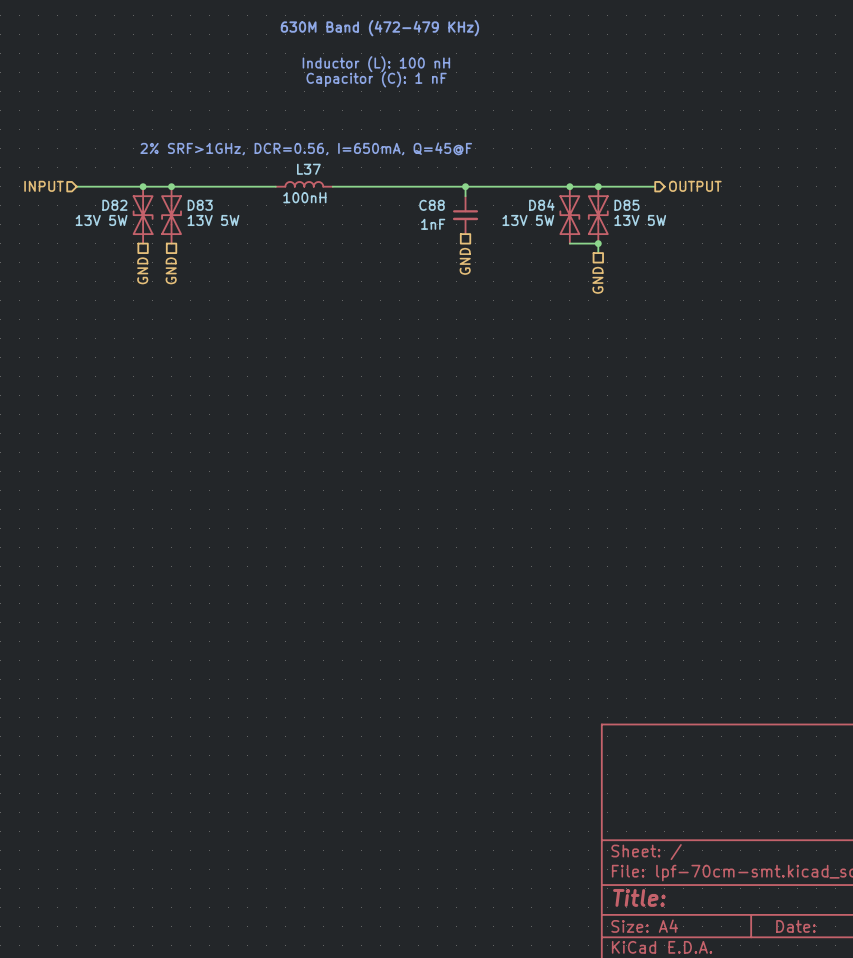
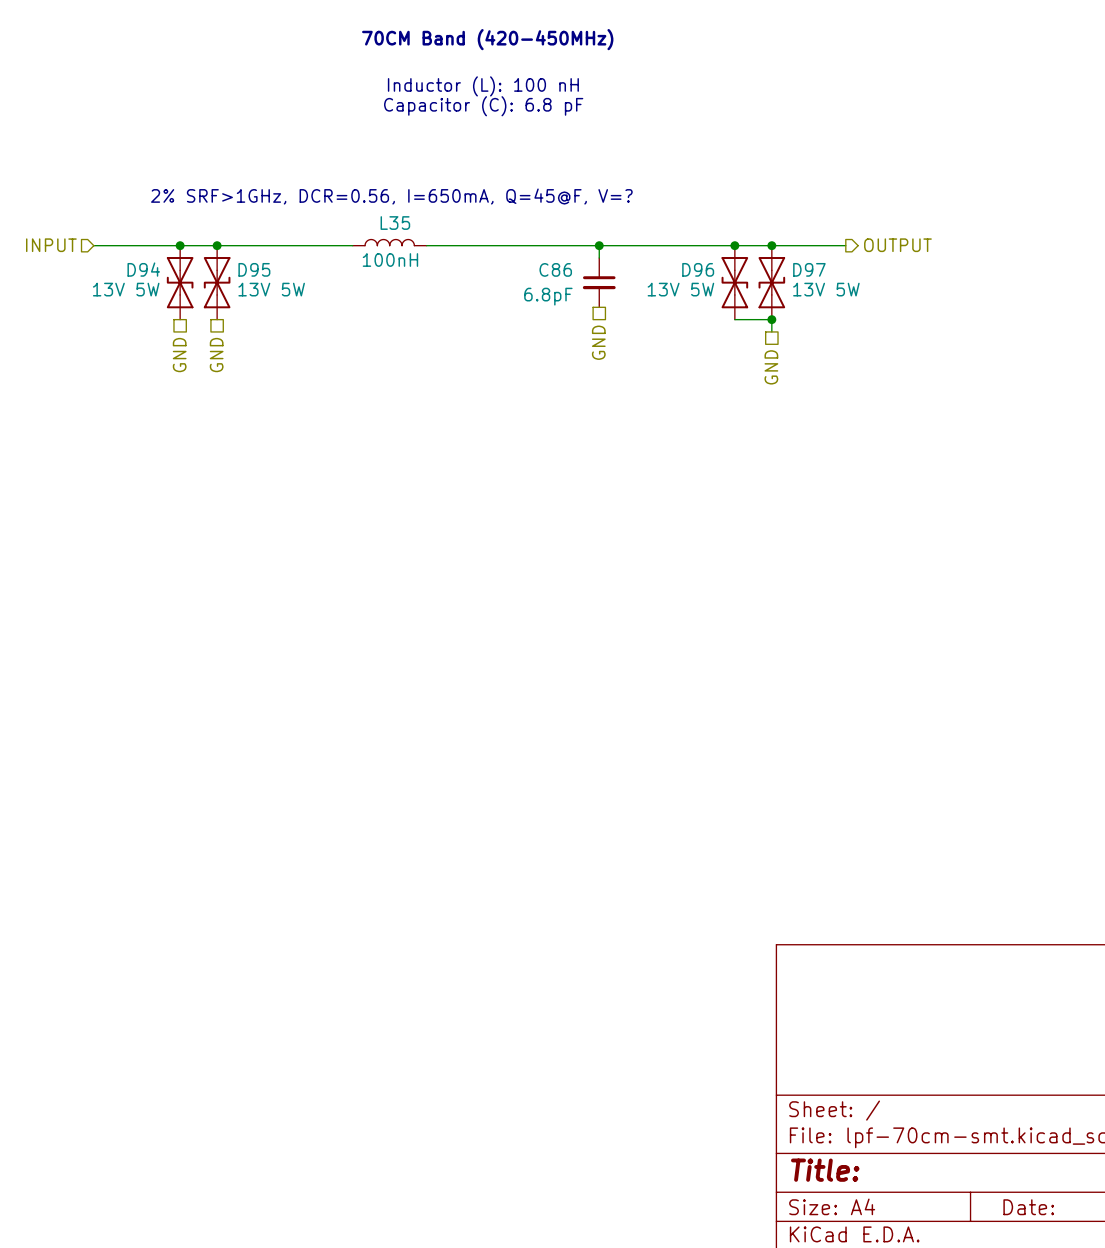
text: 630M Band (472-479 KHz) (379, 28) -> 70CM Band (420-450MHz) (487, 39)
text: Capacitor (C): 1 nF (376, 79) -> Capacitor (C): 6.8 pF (483, 106)
text: 2% SRF>1GHz, DCR=0.56, I=650mA, Q=45@F (306, 148) -> 2% SRF>1GHz, DCR=0.56, I=650mA, Q=45@F, V=? (391, 196)
L37 name: L37 (308, 169) -> L35 (395, 223)
D82 name: D82 (114, 205) -> D94 (143, 269)
D83 name: D83 (200, 205) -> D95 (254, 269)
C88 name: C88 (432, 205) -> C86 (555, 269)
D84 name: D84 (541, 205) -> D96 (698, 269)
D85 name: D85 (626, 205) -> D97 (809, 269)
C88 value: 1nF (433, 224) -> 6.8pF (548, 296)

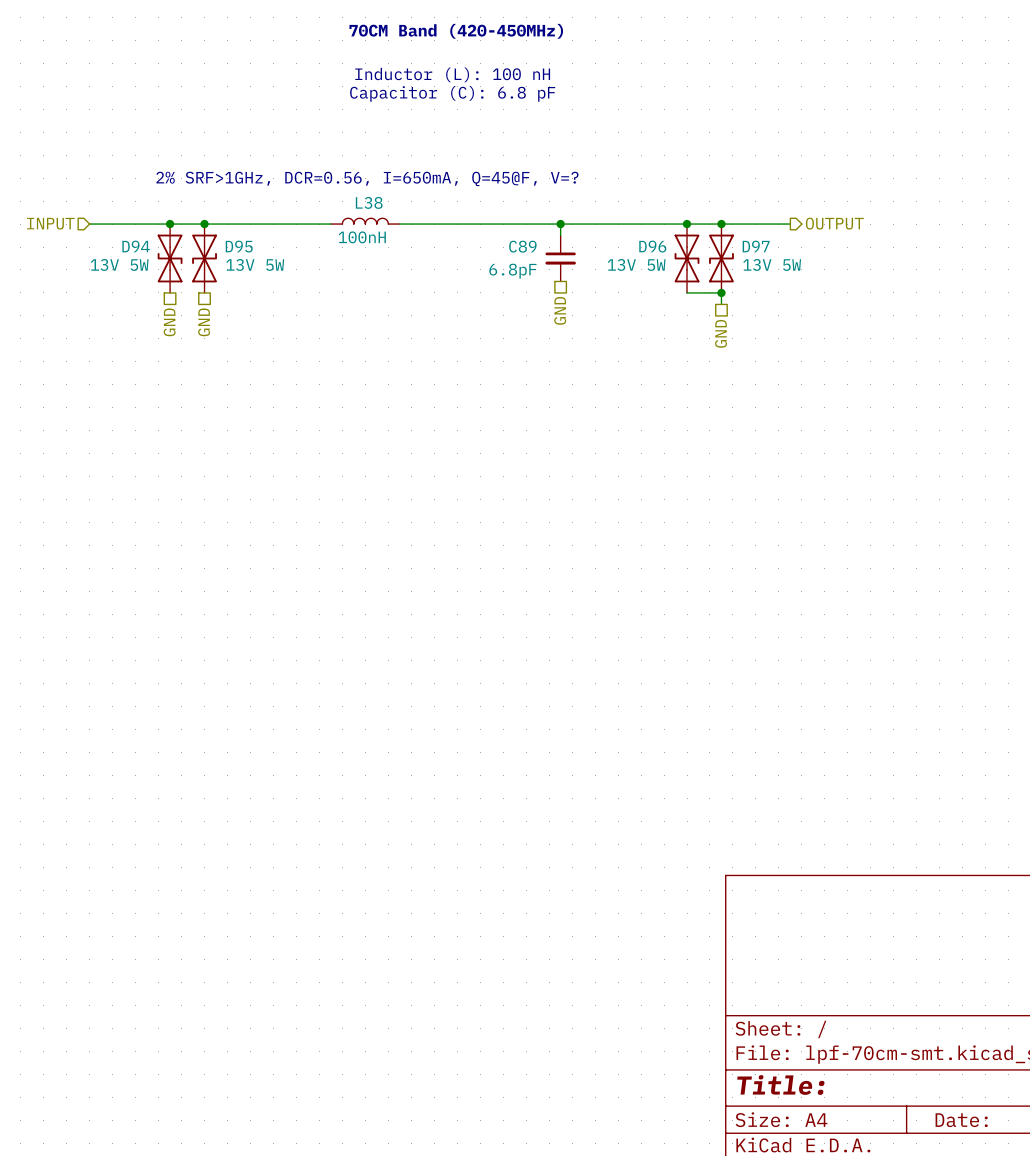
L35 name: L35 (395, 223) -> L38 (369, 202)
C86 name: C86 (555, 269) -> C89 (522, 246)

